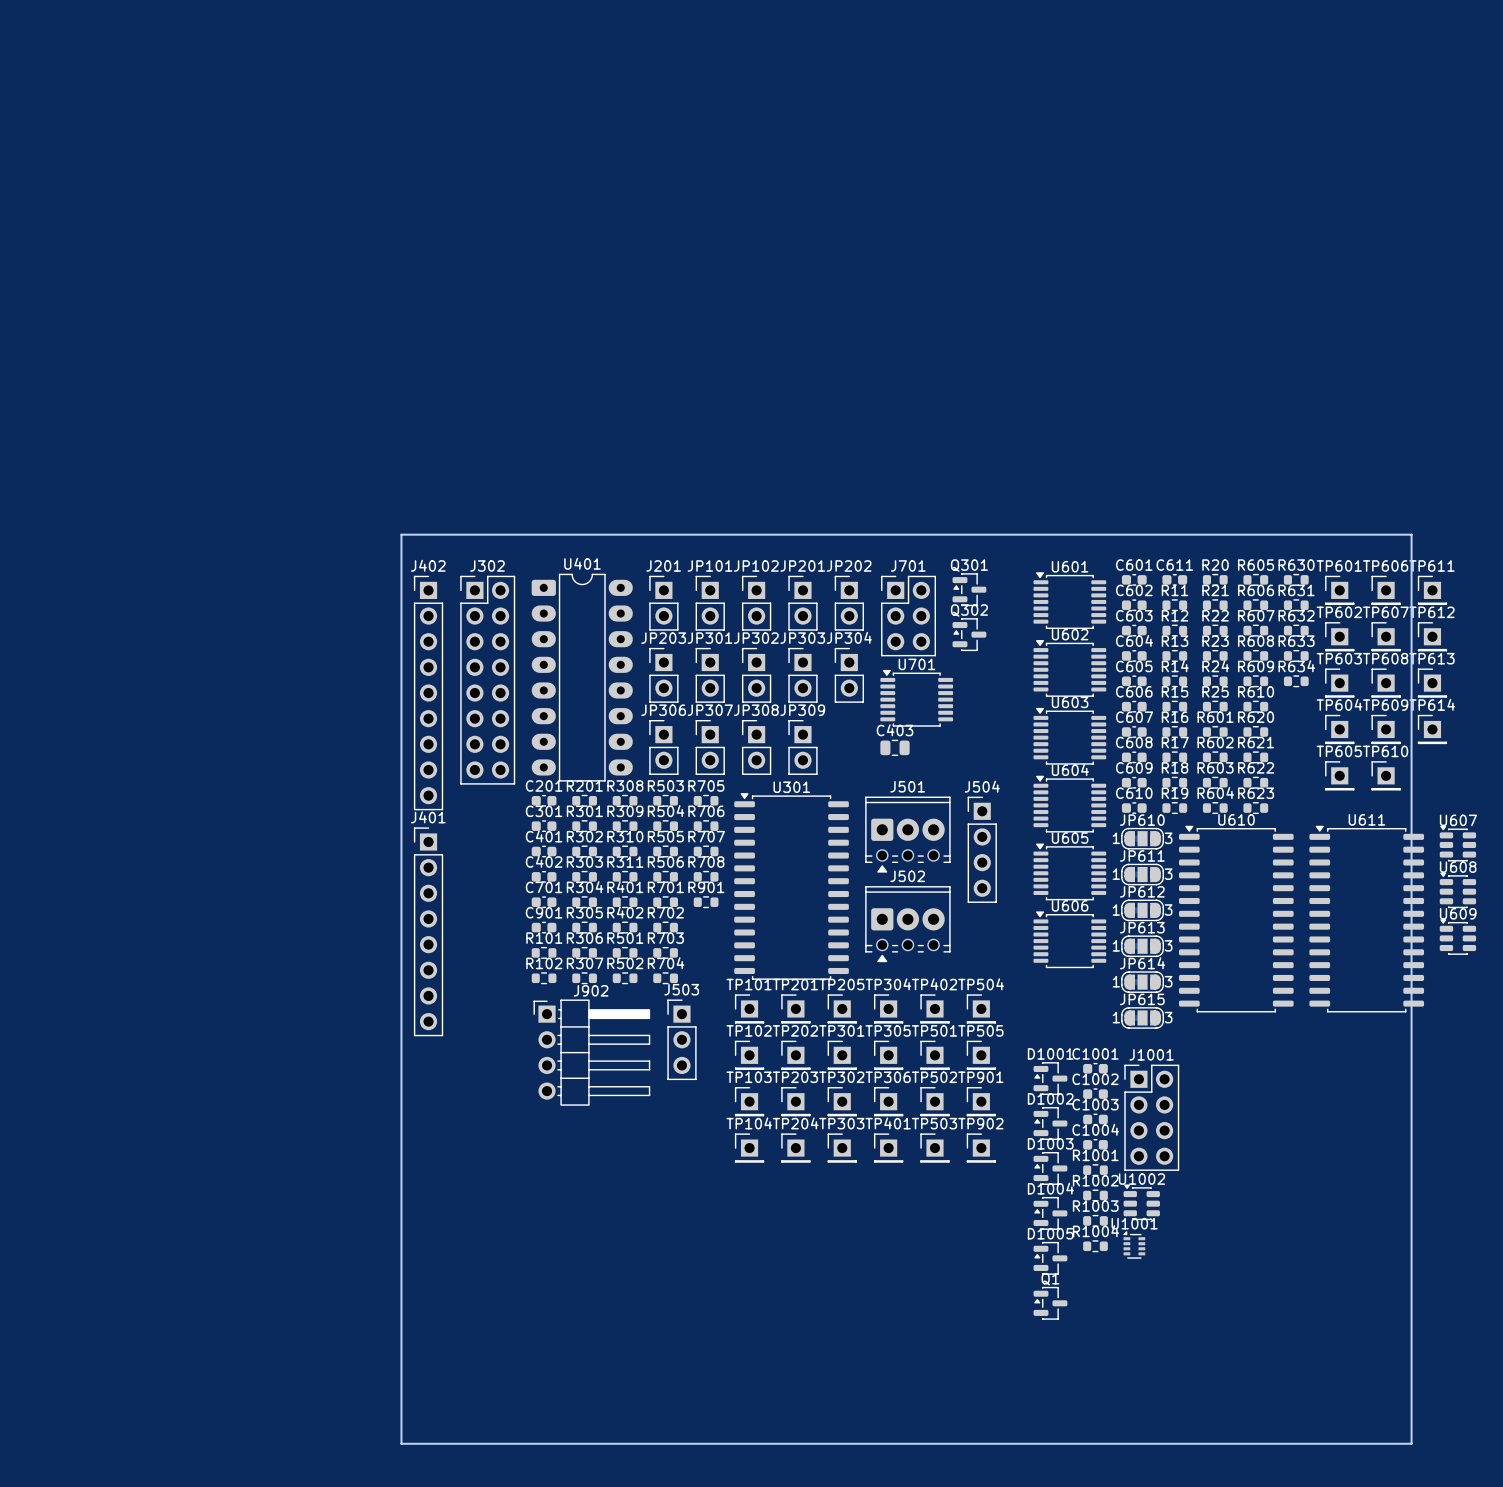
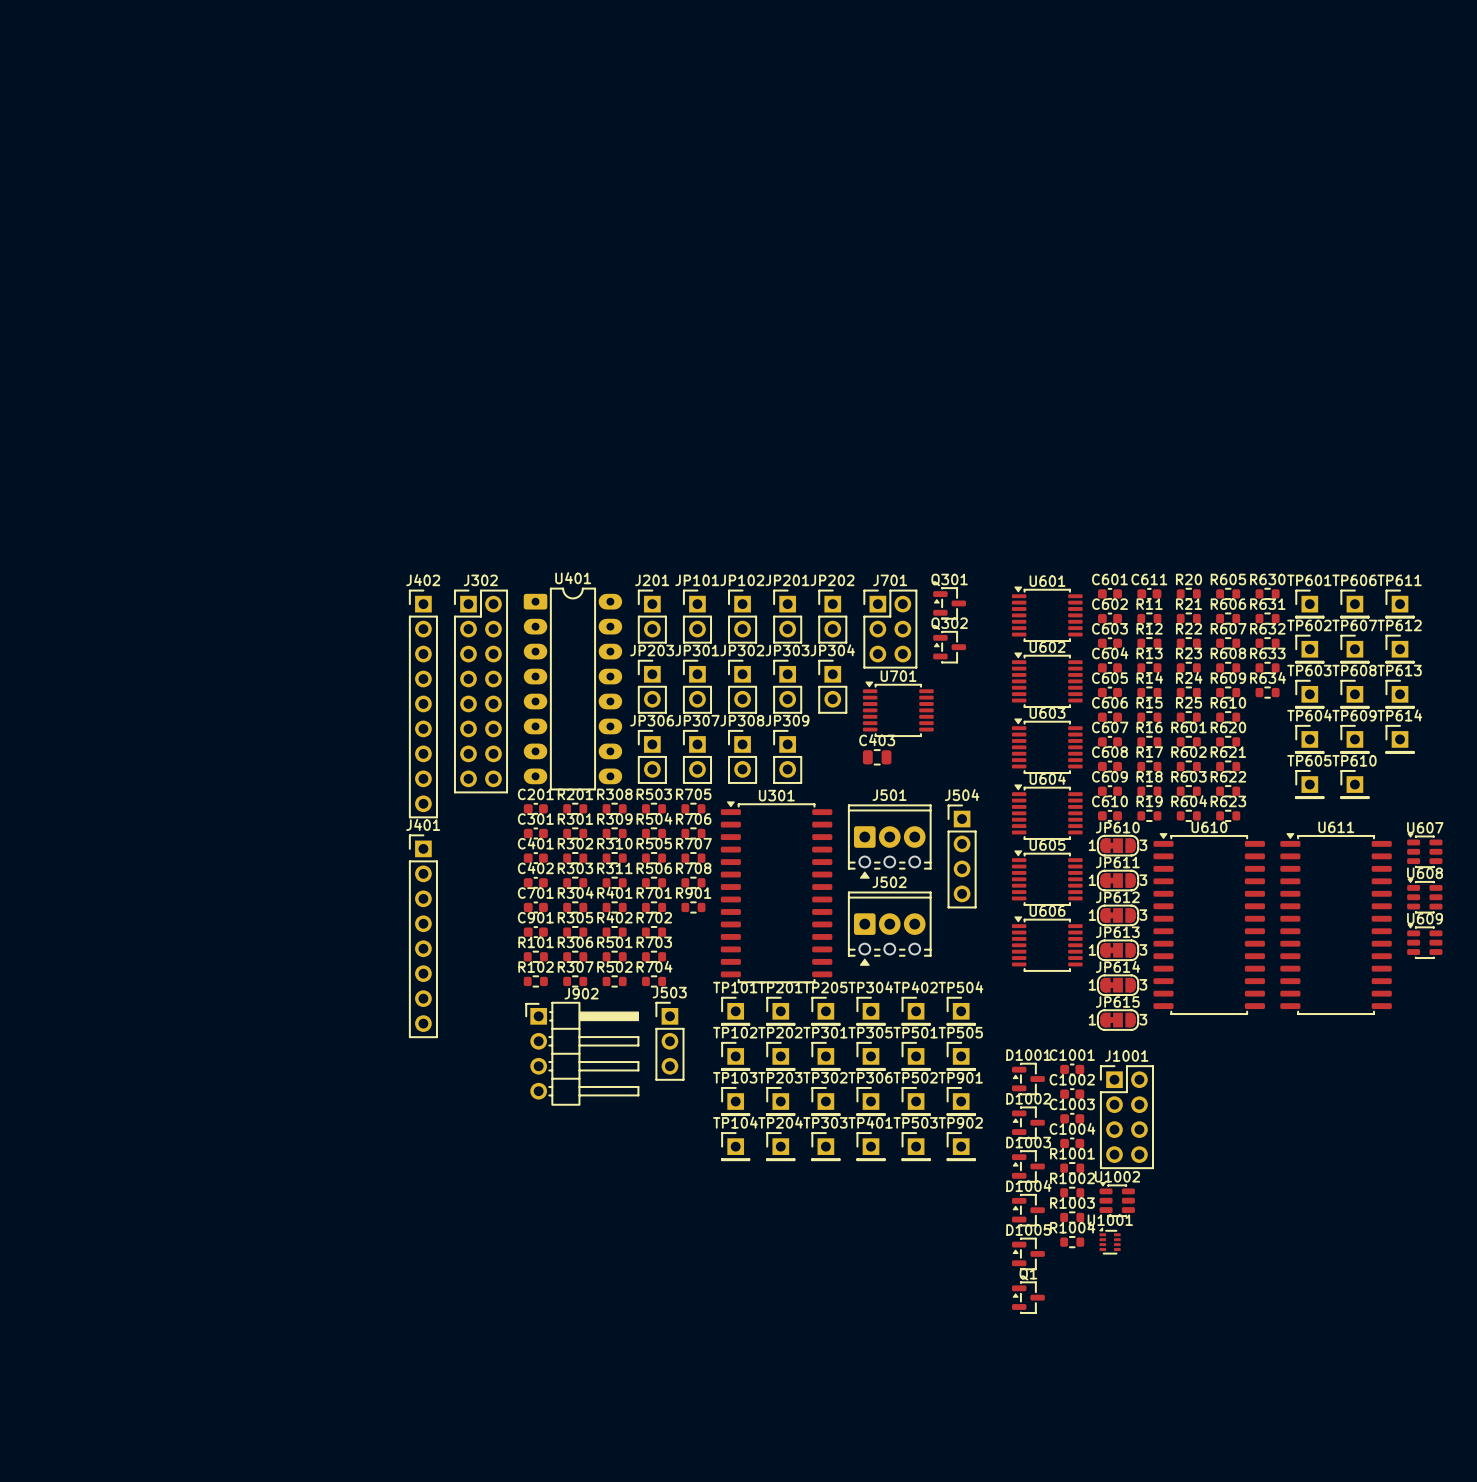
board edge: (401, 534) (1411, 534) (1411, 1443) (401, 1443) (401, 534) -> none

